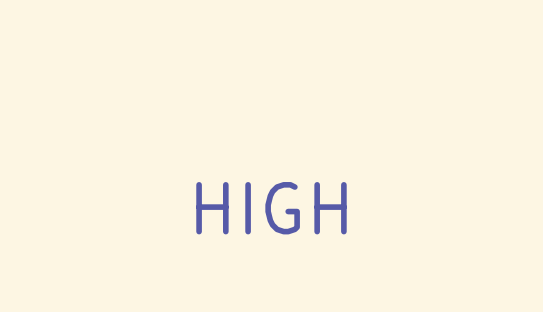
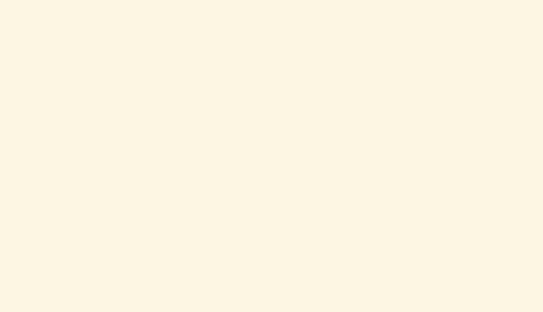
text: HIGH (271, 208) -> none

